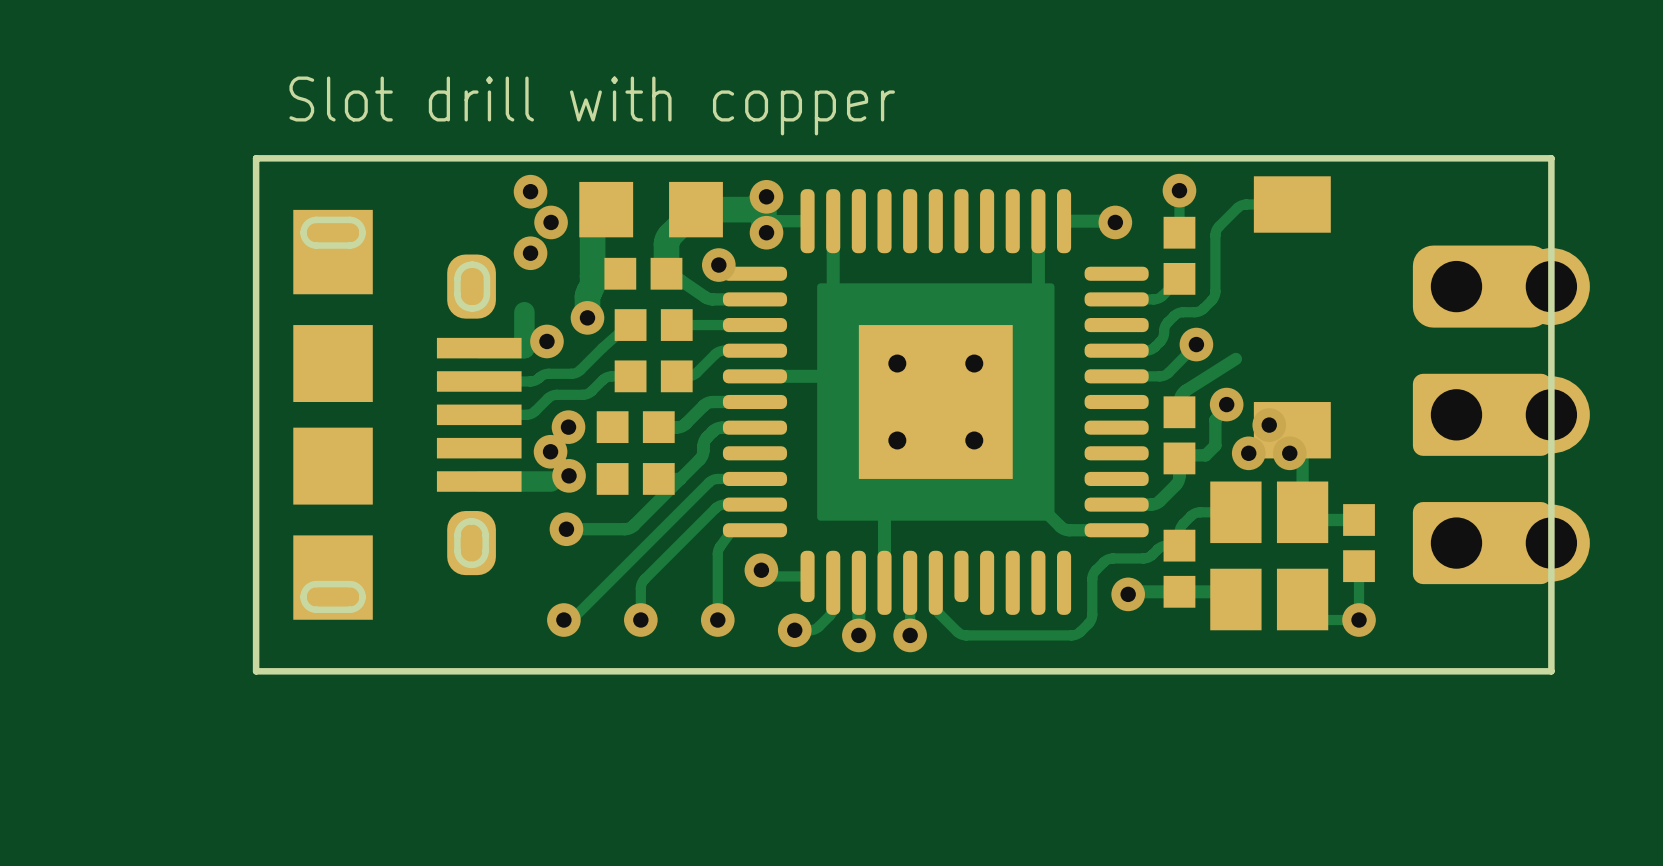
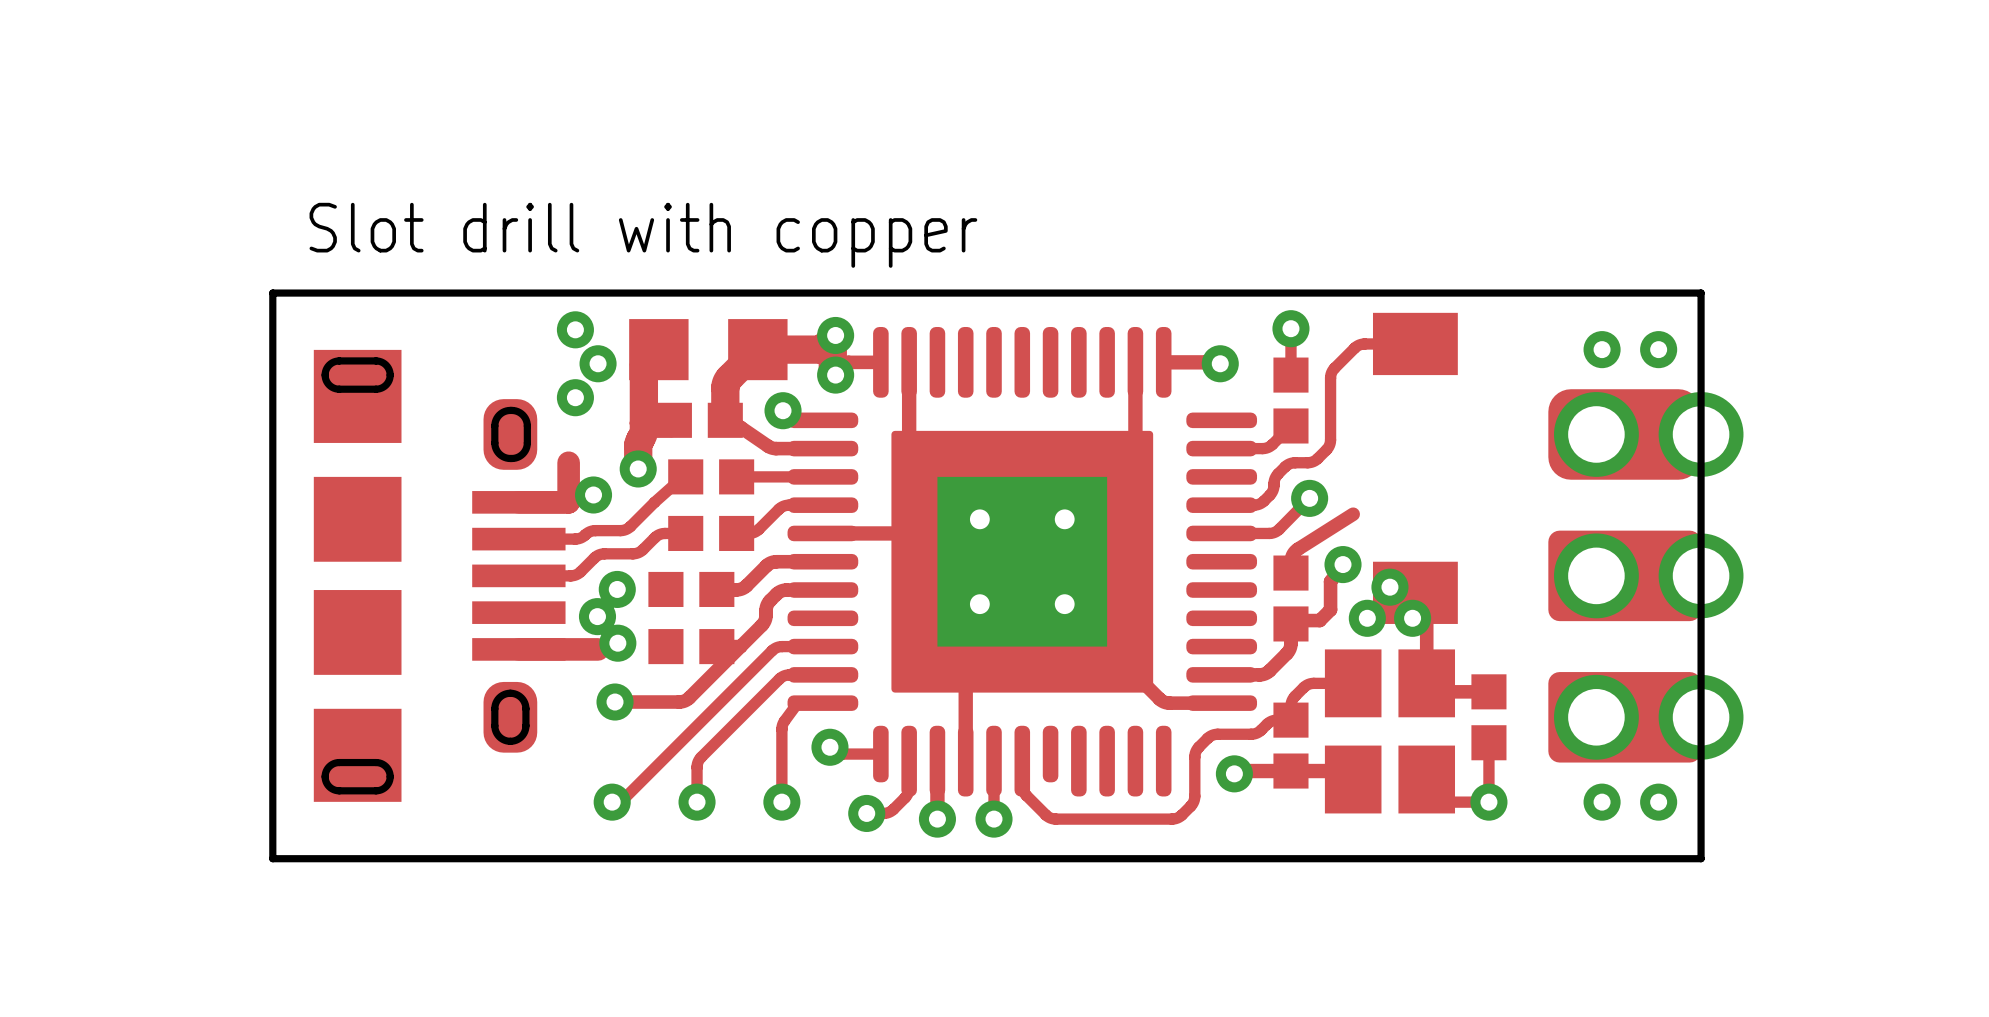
via: none -> (1602, 349)
via: none -> (1658, 349)
via: none -> (1602, 802)
via: none -> (1658, 802)

